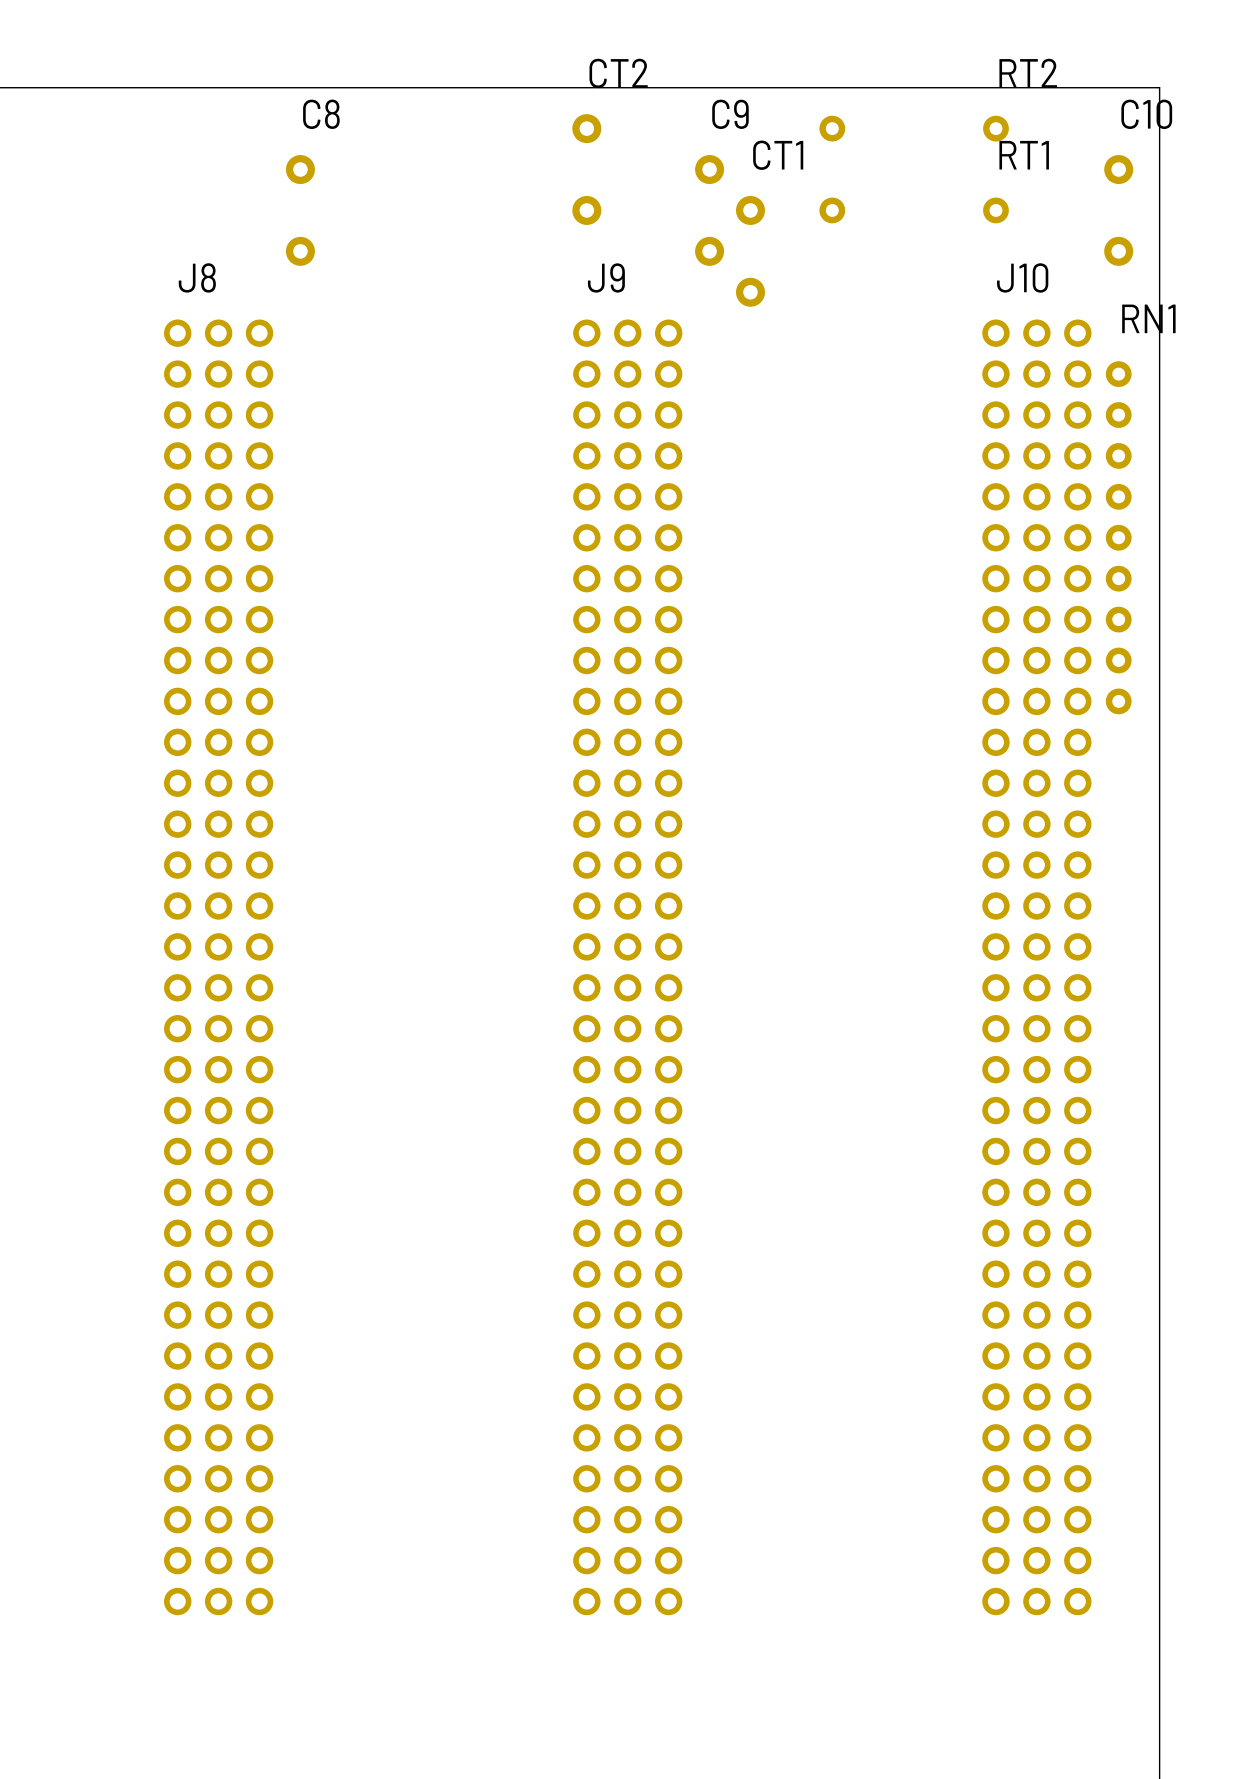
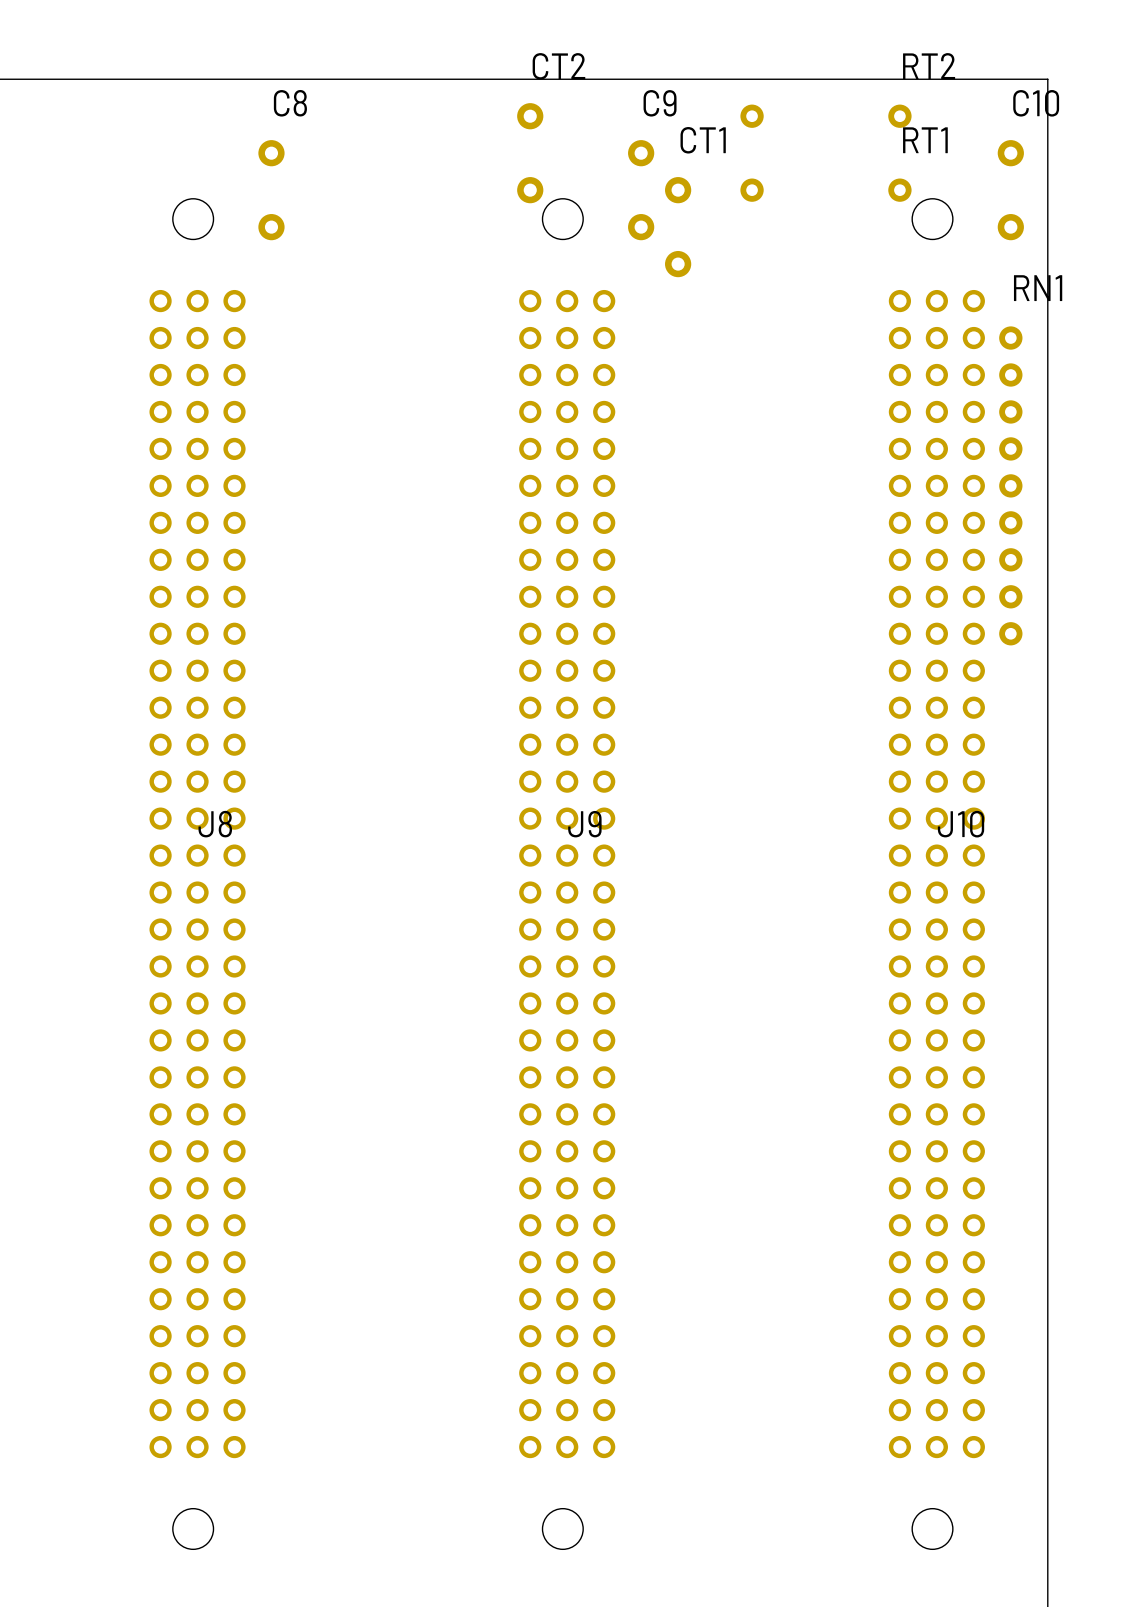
J8 name position: J8 (197, 277) -> J8 (215, 824)
J9 name position: J9 (606, 277) -> J9 (584, 824)
J10 name position: J10 (1022, 277) -> J10 (961, 824)
J8 footprint: [164, 319, 274, 1616] -> [149, 198, 246, 1550]
J9 footprint: [573, 319, 683, 1616] -> [519, 198, 616, 1550]
J10 footprint: [982, 319, 1092, 1616] -> [888, 198, 985, 1550]

